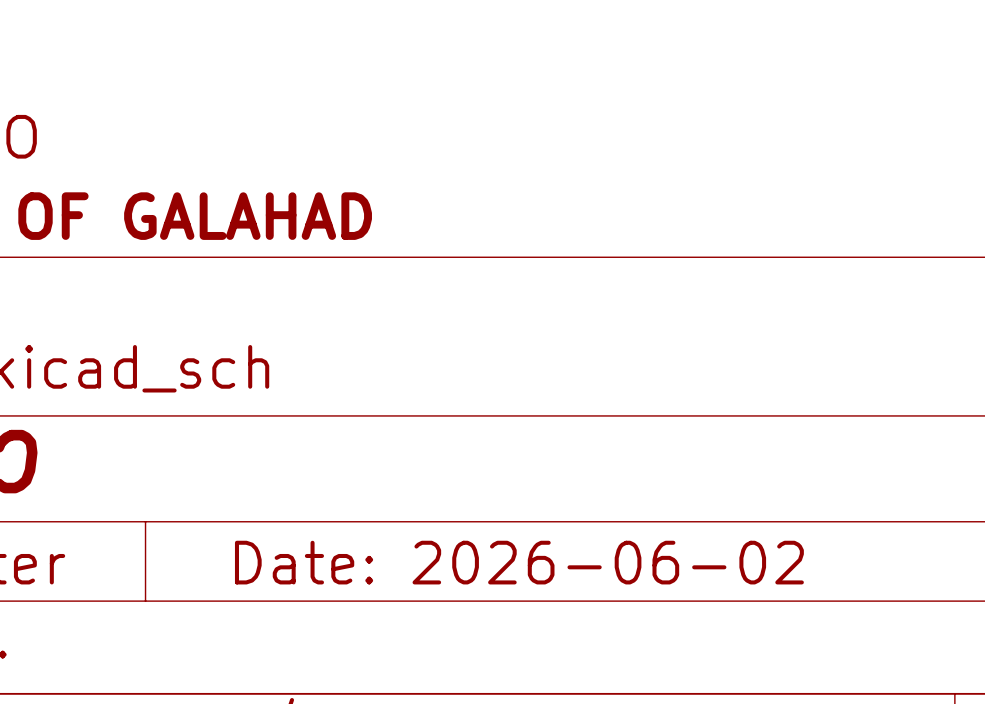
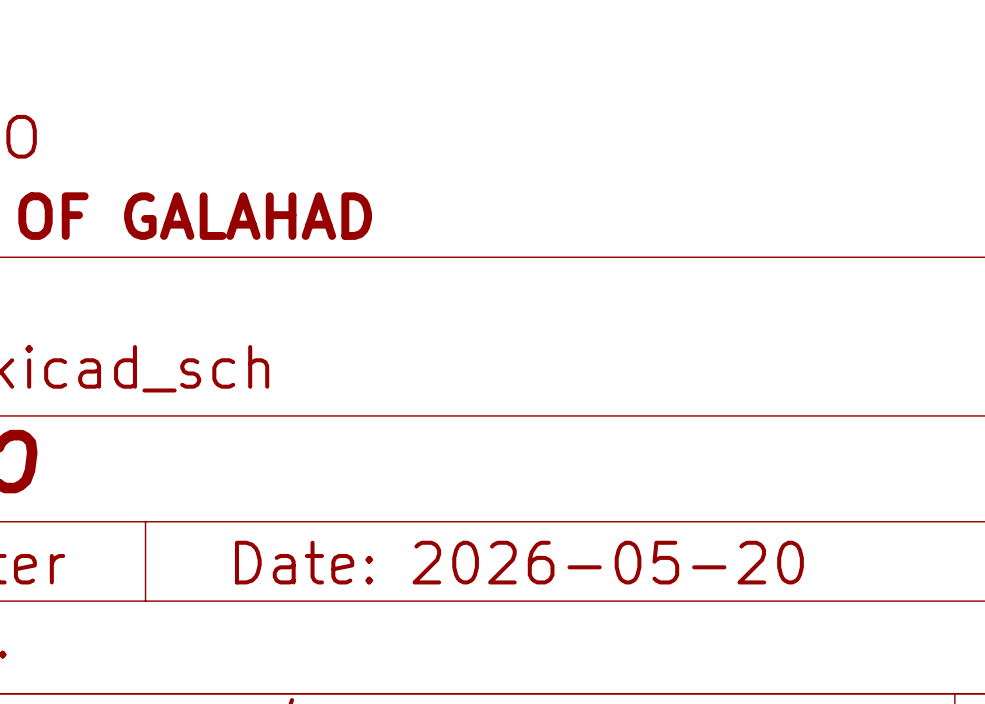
title block: Date: 2026-06-02 (519, 562) -> Date: 2026-05-20 (519, 562)

